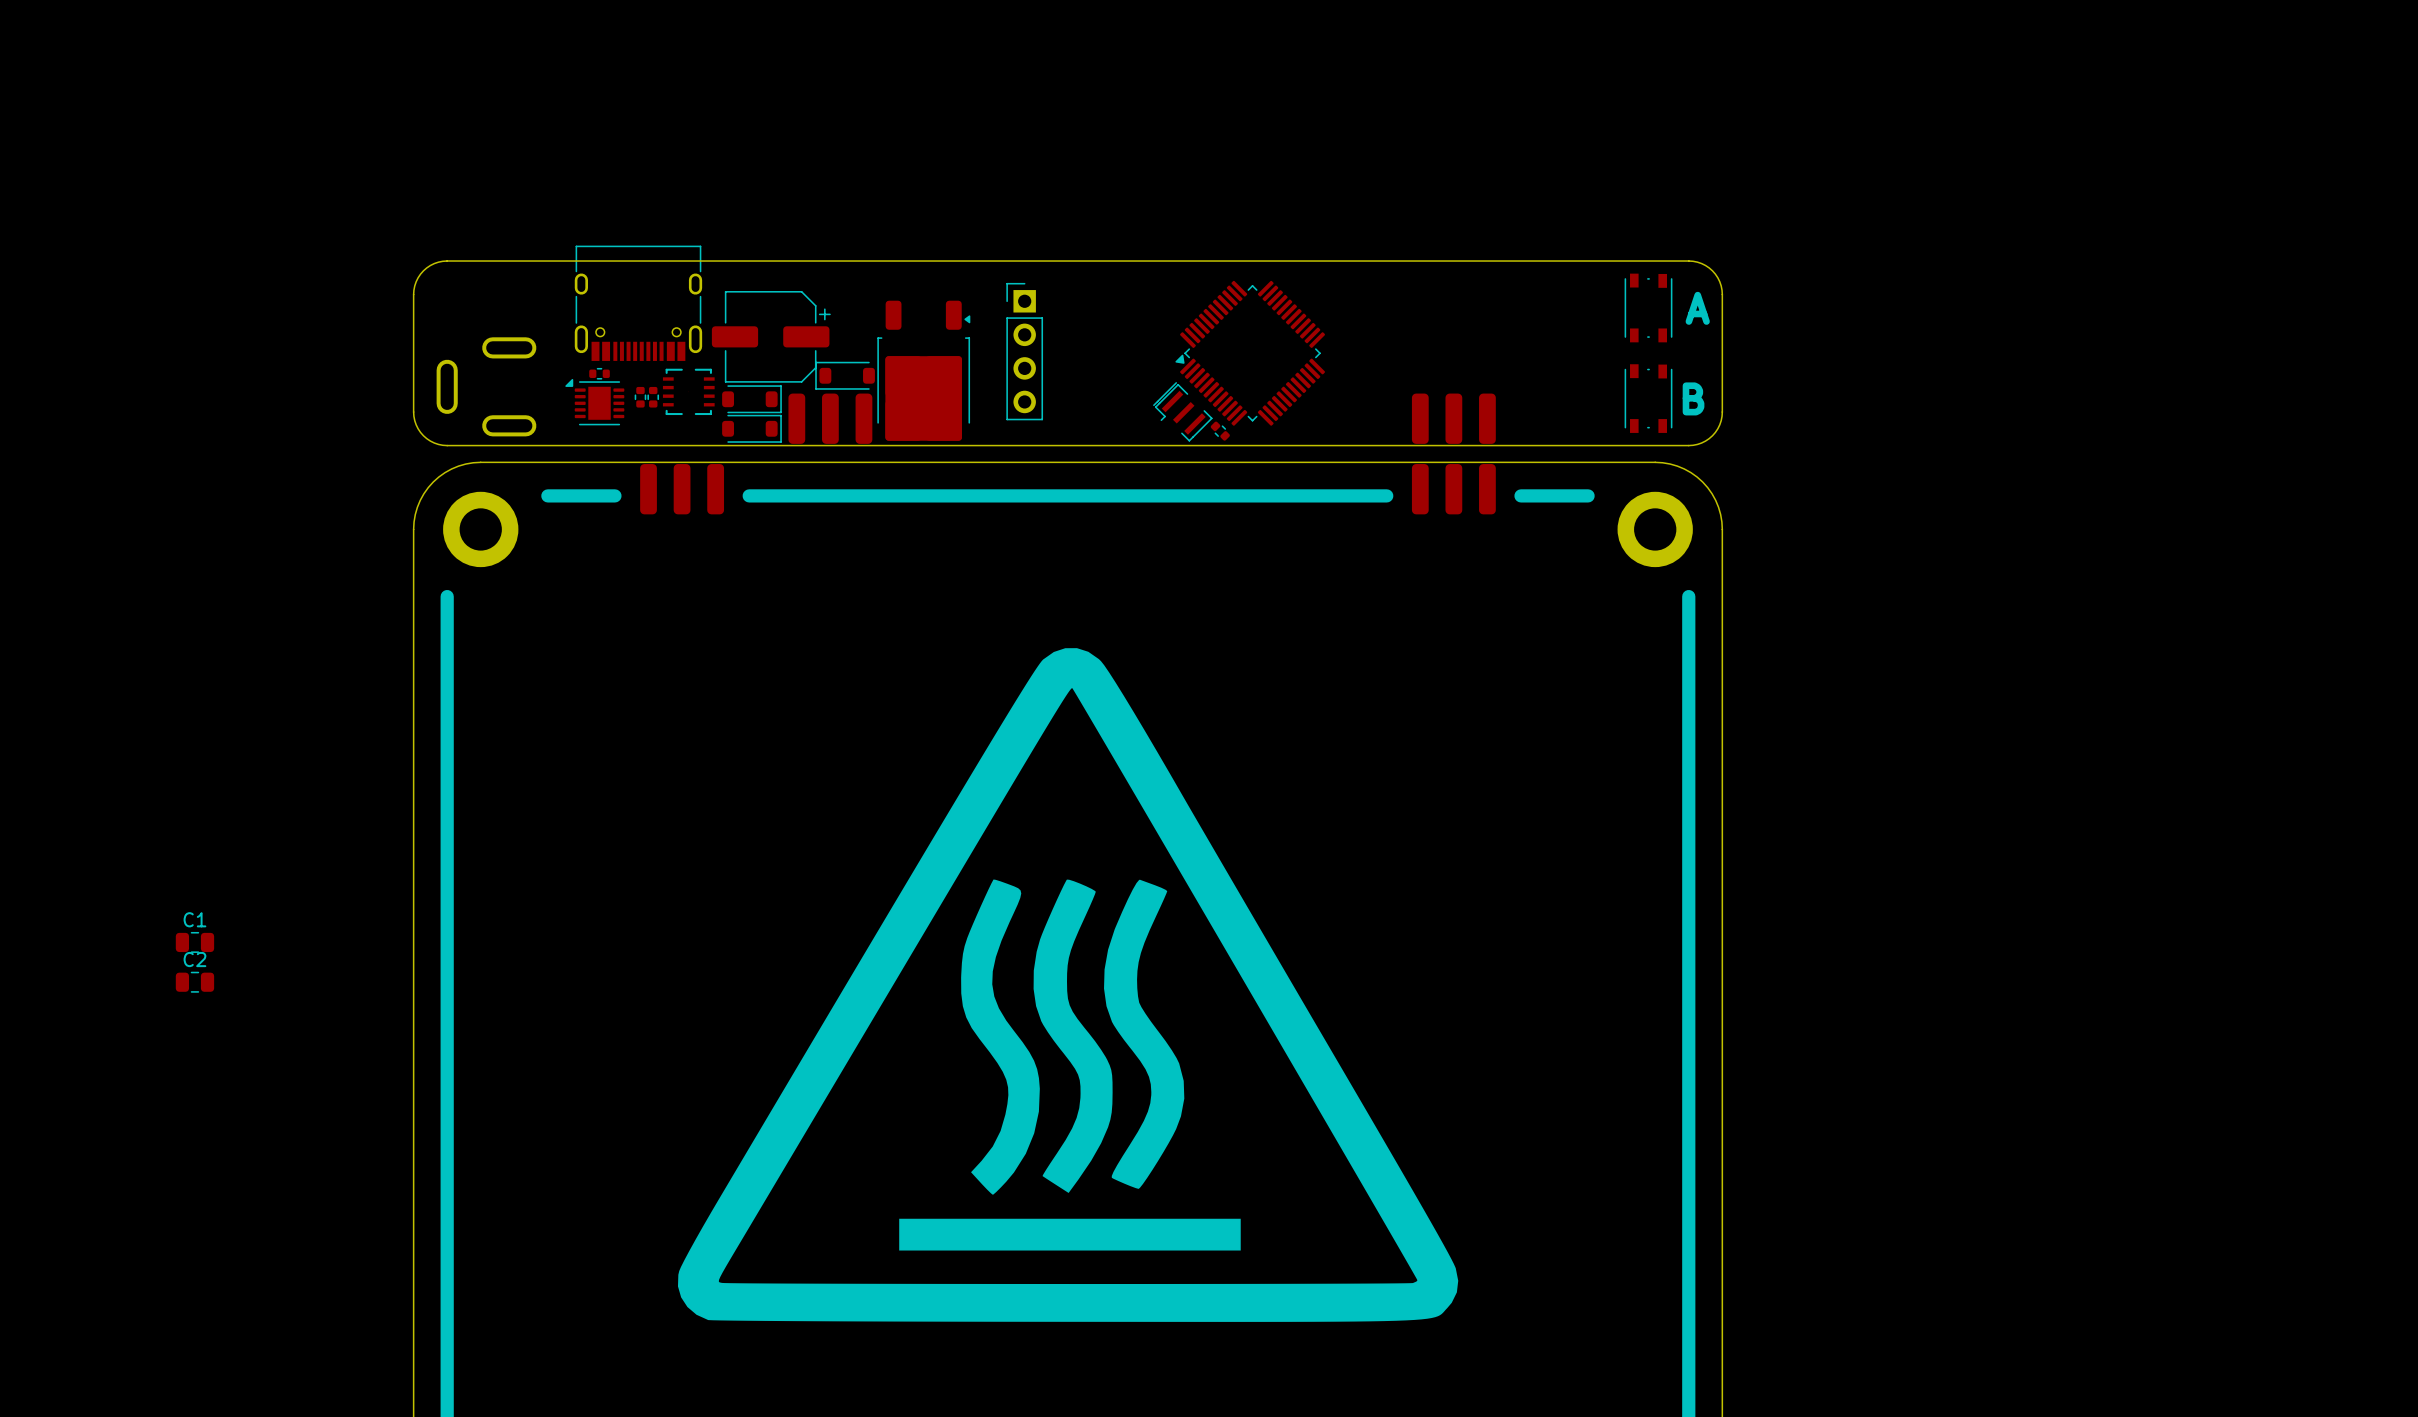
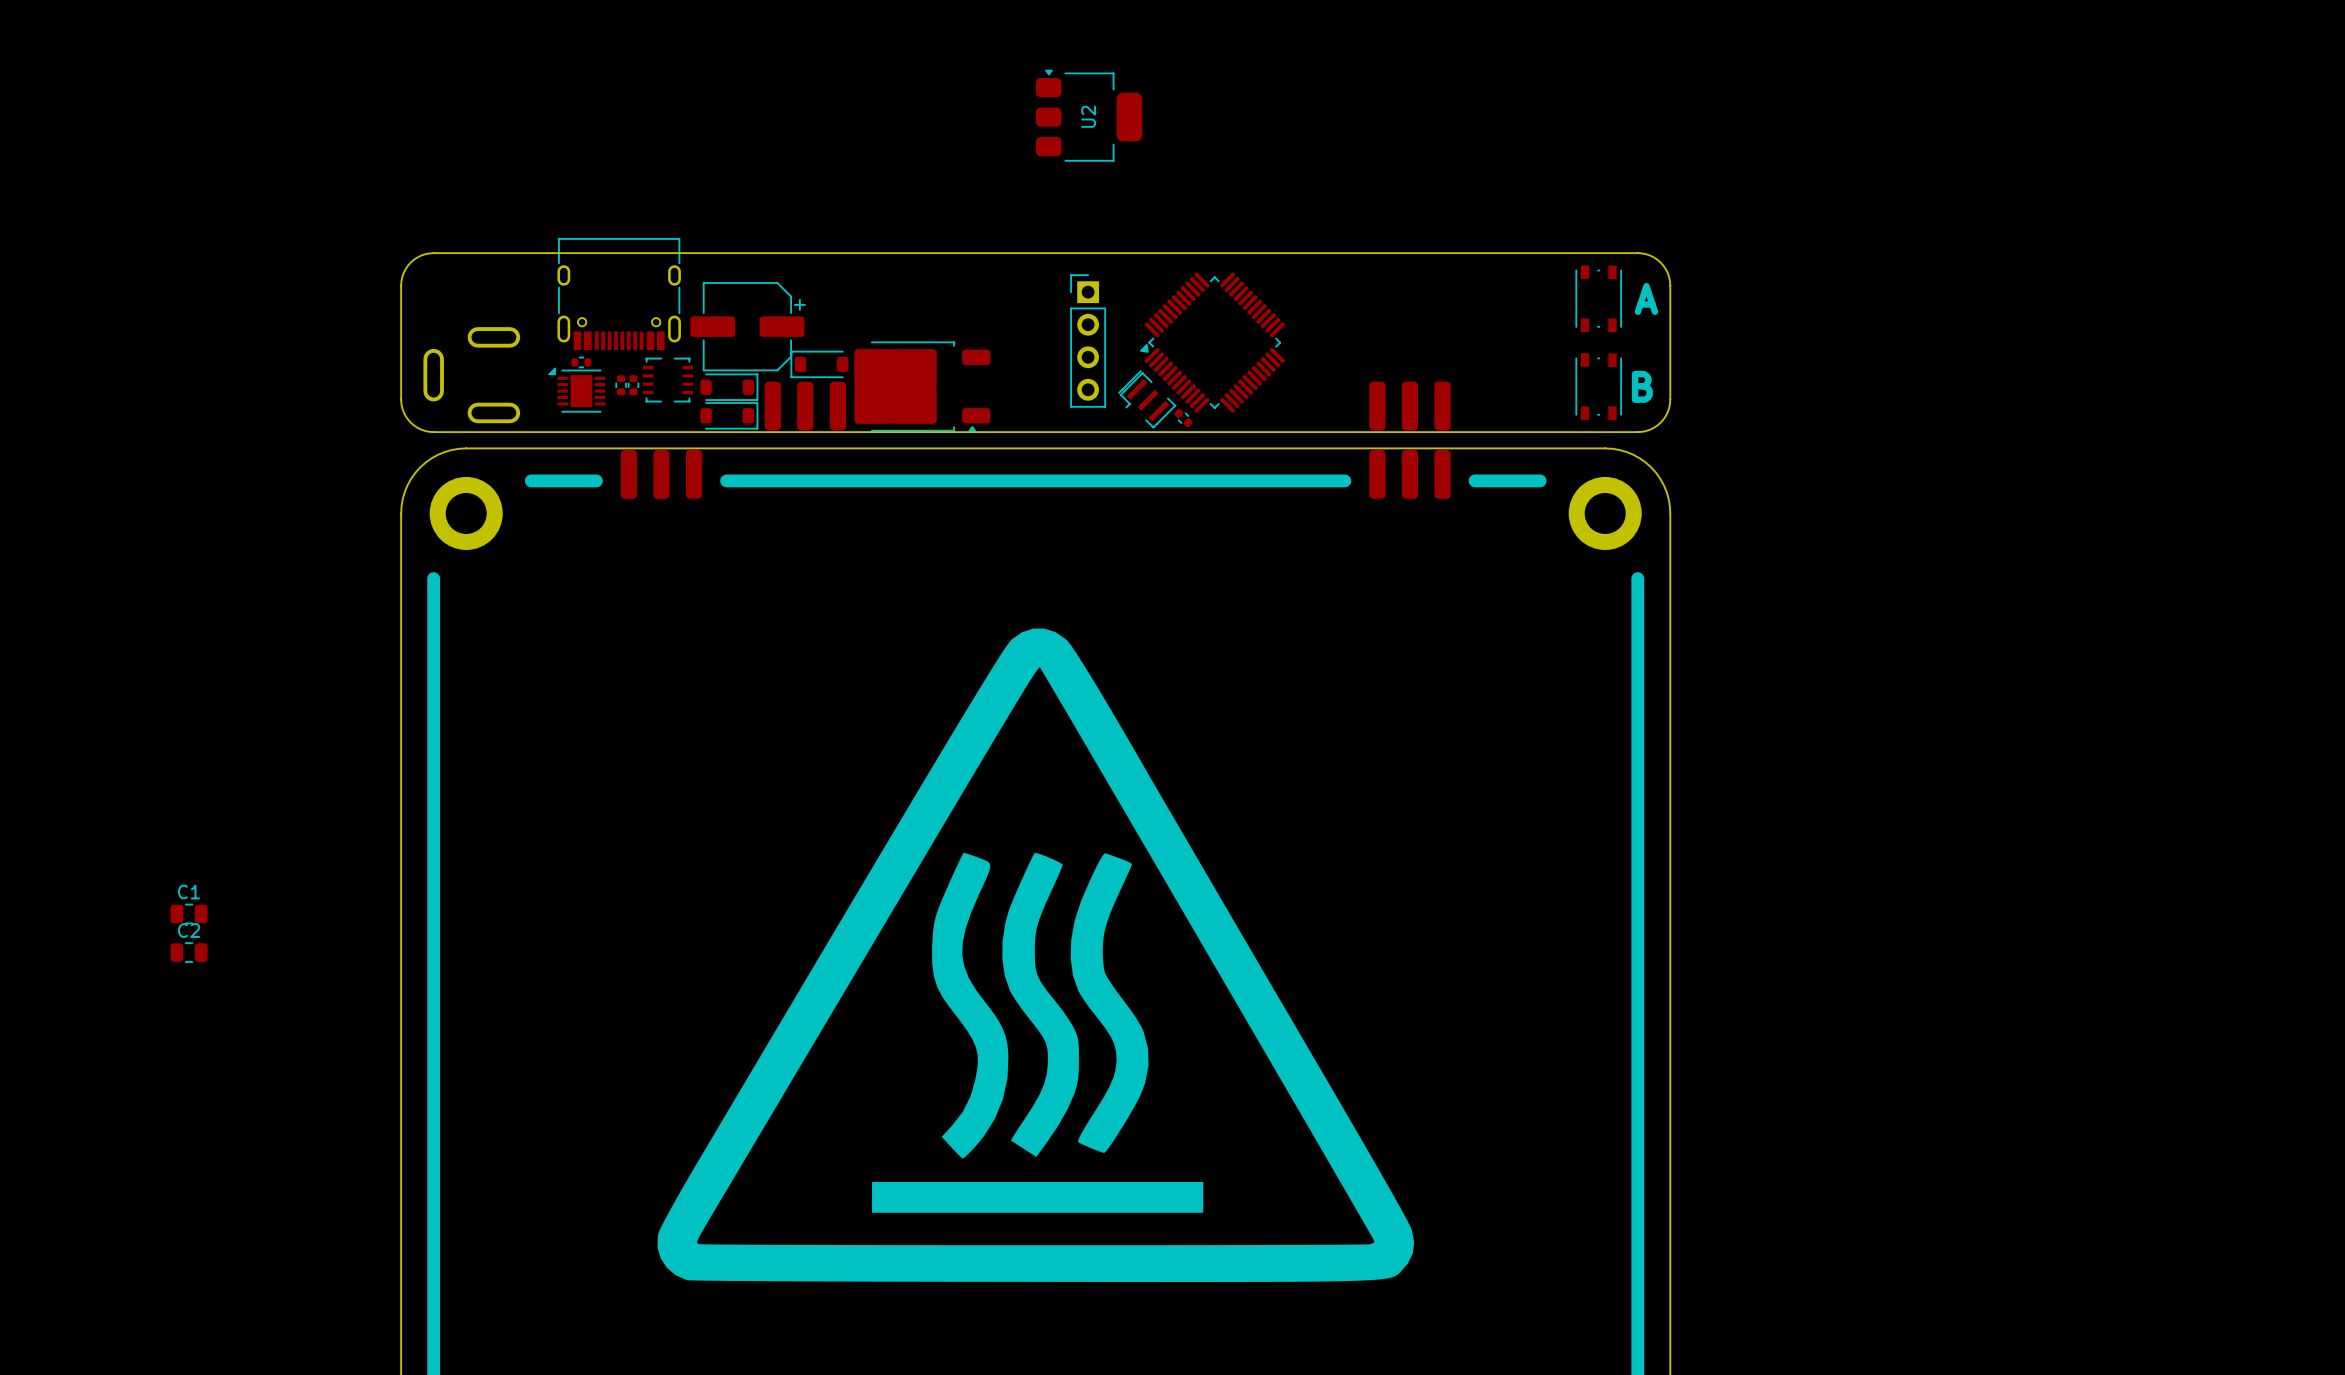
U2: none -> (1089, 115)
part position: (1024, 351) -> (1088, 340)
part rotation: 0° (923, 370) -> 90° clockwise (922, 386)

